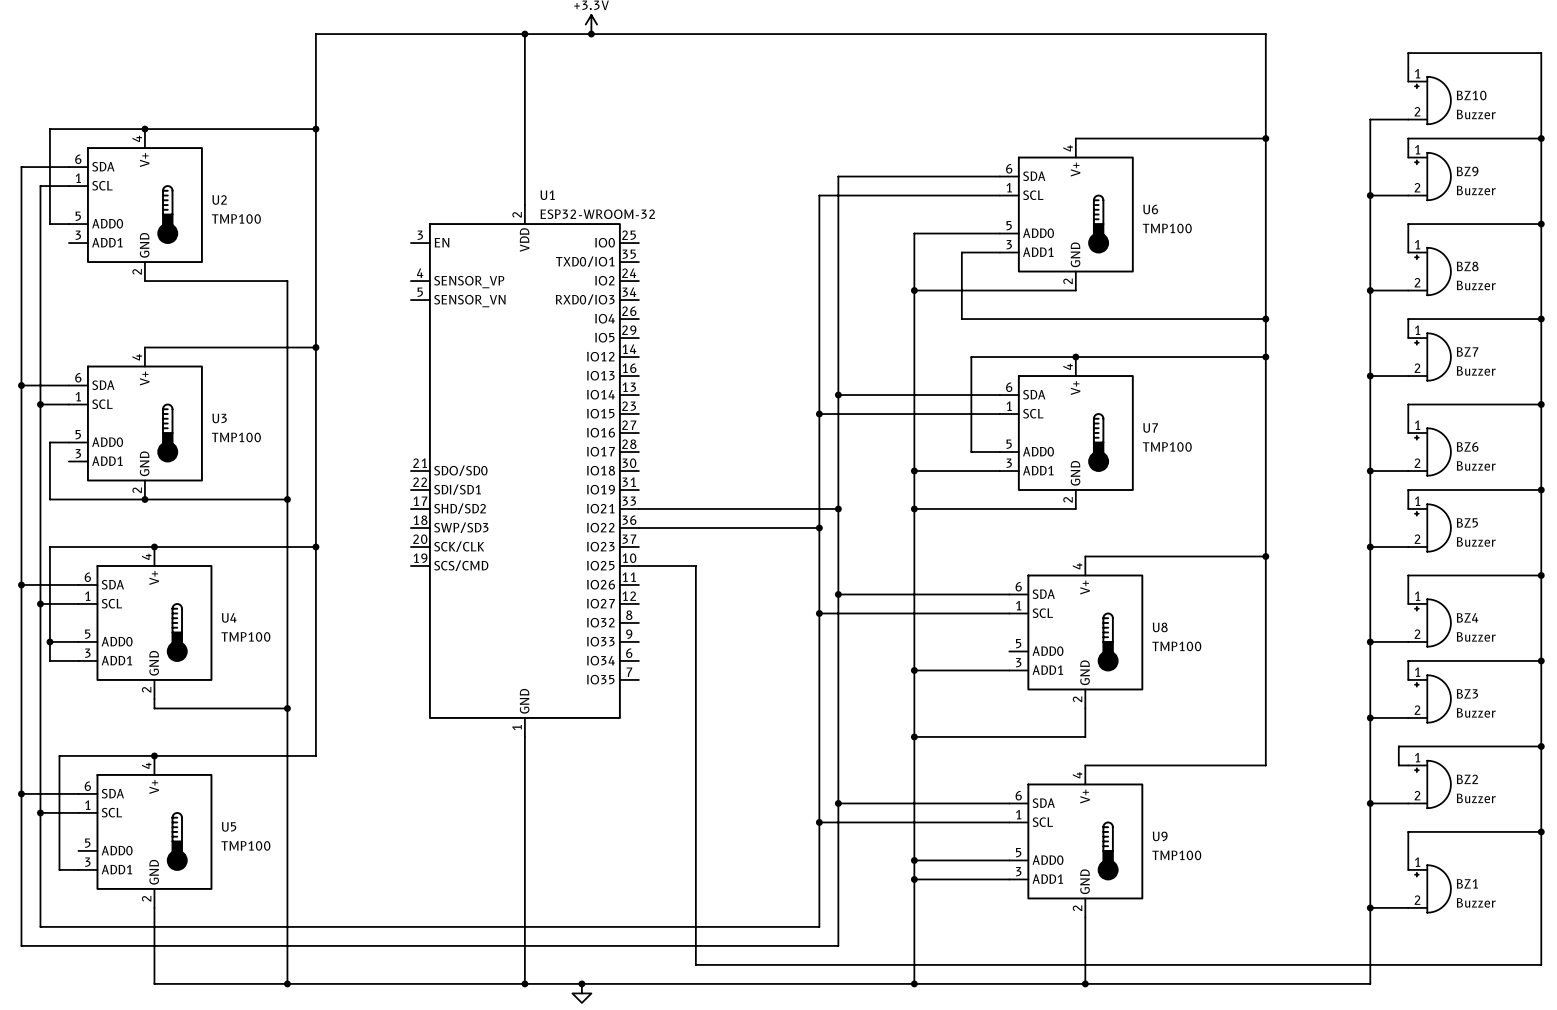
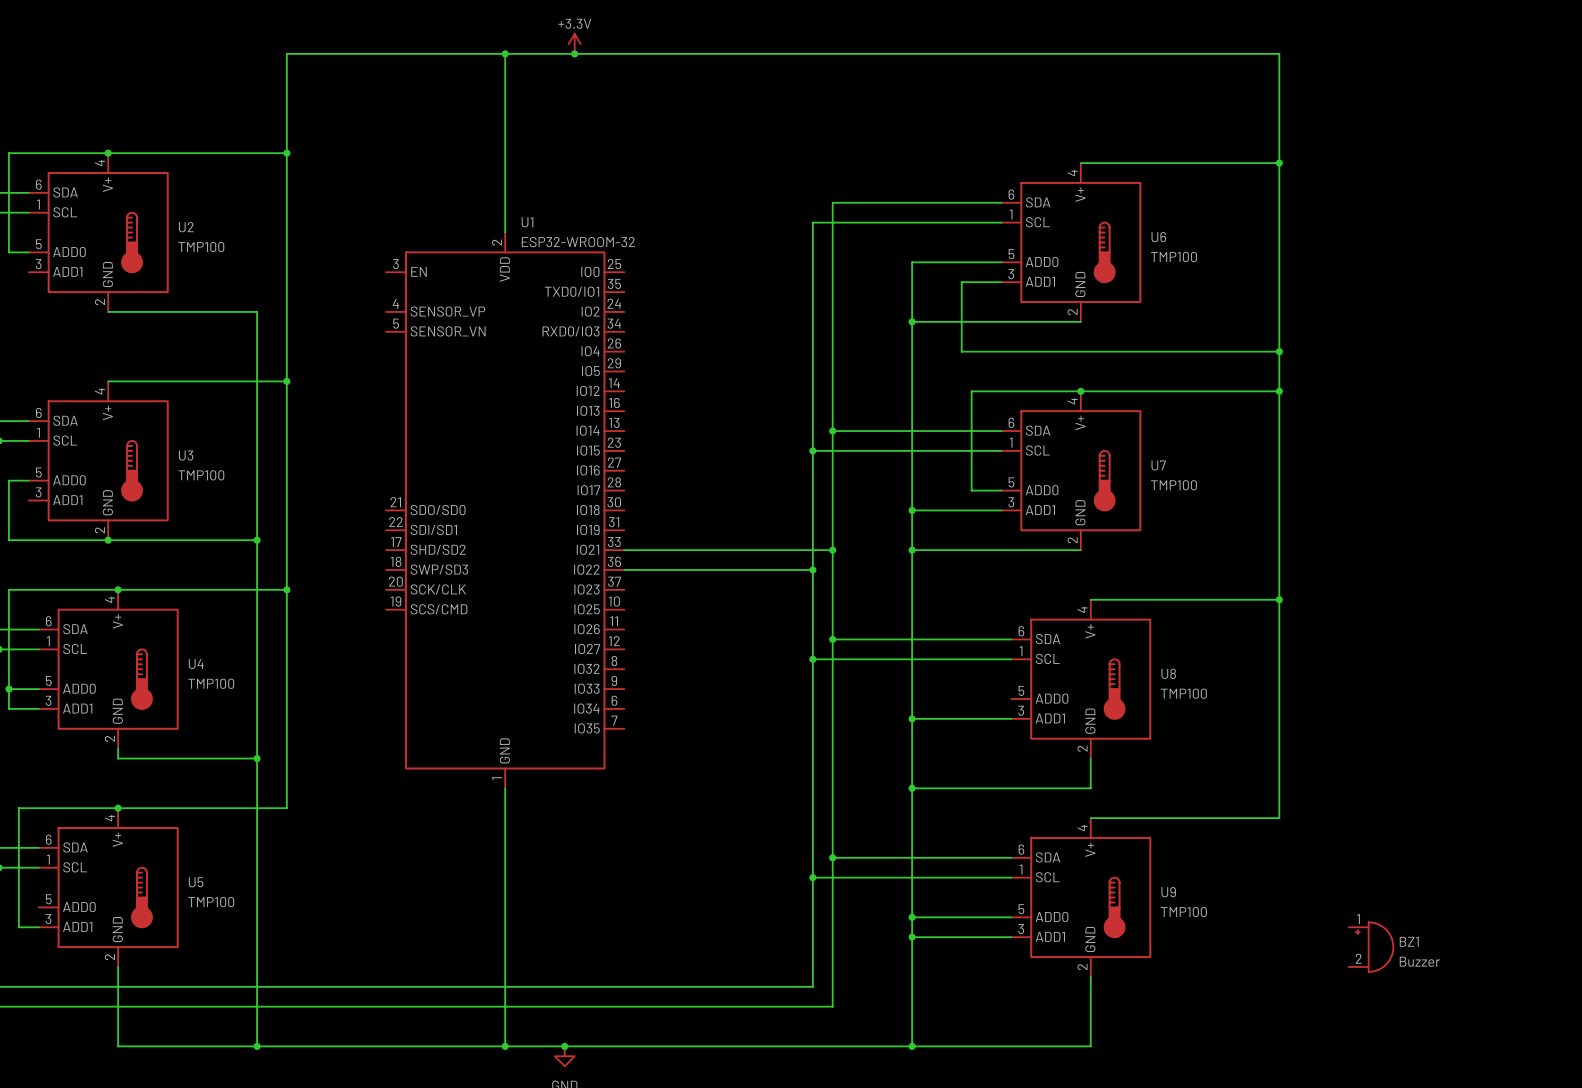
wire: (1408, 81) (1408, 53) (1541, 53) (1541, 964) (695, 964) (695, 565) (638, 565) -> none
BZ10: Buzzer (1429, 100) -> none
wire: (1408, 119) (1370, 119) (1370, 983) (1085, 983) -> none
wire: (1541, 138) (1408, 138) (1408, 157) -> none
junction: (1541, 138) -> none
BZ9: Buzzer (1429, 176) -> none
wire: (1370, 195) (1408, 195) -> none
junction: (1370, 195) -> none
wire: (1541, 224) (1408, 224) (1408, 252) -> none
junction: (1541, 224) -> none
BZ8: Buzzer (1429, 271) -> none
wire: (1370, 290) (1408, 290) -> none
junction: (1370, 290) -> none
wire: (1541, 319) (1408, 319) (1408, 338) -> none
junction: (1541, 319) -> none
BZ7: Buzzer (1429, 357) -> none
wire: (1370, 376) (1408, 376) -> none
junction: (1370, 376) -> none
wire: (1541, 404) (1408, 404) (1408, 433) -> none
junction: (1541, 404) -> none
BZ6: Buzzer (1429, 452) -> none
wire: (1370, 471) (1408, 471) -> none
junction: (1370, 471) -> none
wire: (1541, 490) (1408, 490) (1408, 508) -> none
junction: (1541, 490) -> none
BZ5: Buzzer (1429, 527) -> none
wire: (1370, 546) (1408, 546) -> none
junction: (1370, 546) -> none
wire: (1541, 575) (1408, 575) (1408, 603) -> none
junction: (1541, 575) -> none
BZ4: Buzzer (1429, 622) -> none
wire: (1370, 641) (1408, 641) -> none
junction: (1370, 641) -> none
wire: (1541, 660) (1408, 660) (1408, 679) -> none
junction: (1541, 660) -> none
BZ3: Buzzer (1429, 698) -> none
wire: (1370, 717) (1408, 717) -> none
junction: (1370, 717) -> none
wire: (1541, 746) (1398, 746) (1398, 765) (1408, 765) -> none
junction: (1541, 746) -> none
BZ2: Buzzer (1429, 784) -> none
wire: (1370, 803) (1408, 803) -> none
junction: (1370, 803) -> none
wire: (1541, 831) (1408, 831) (1408, 869) -> none
junction: (1541, 831) -> none
BZ1 position: (1429, 888) -> (1371, 947)
wire: (1370, 907) (1408, 907) -> none
junction: (1370, 907) -> none
junction: (1085, 983) -> none

